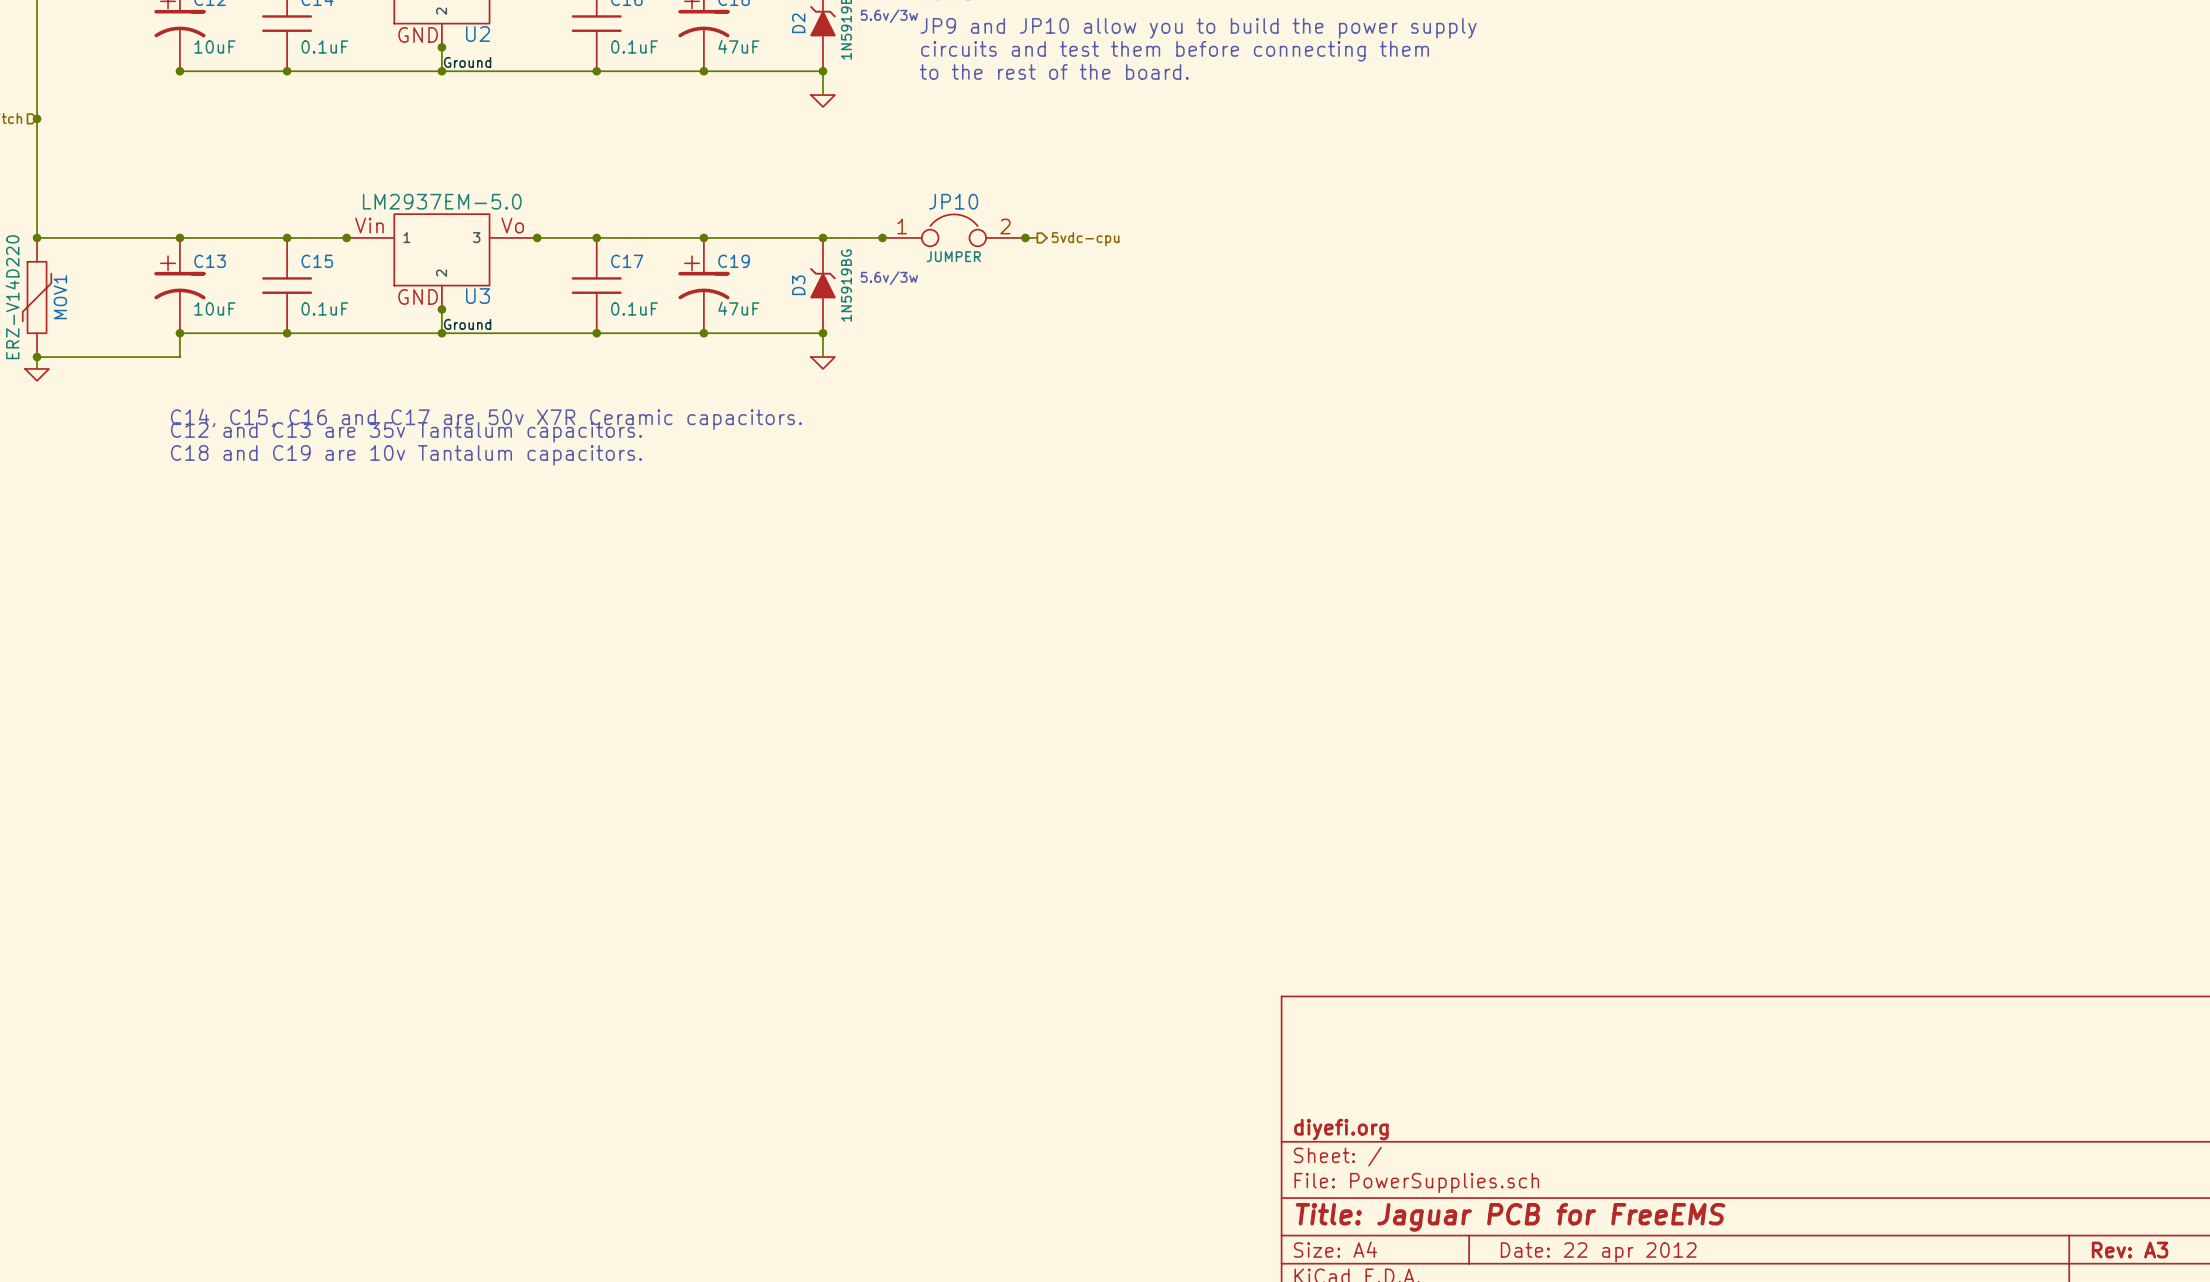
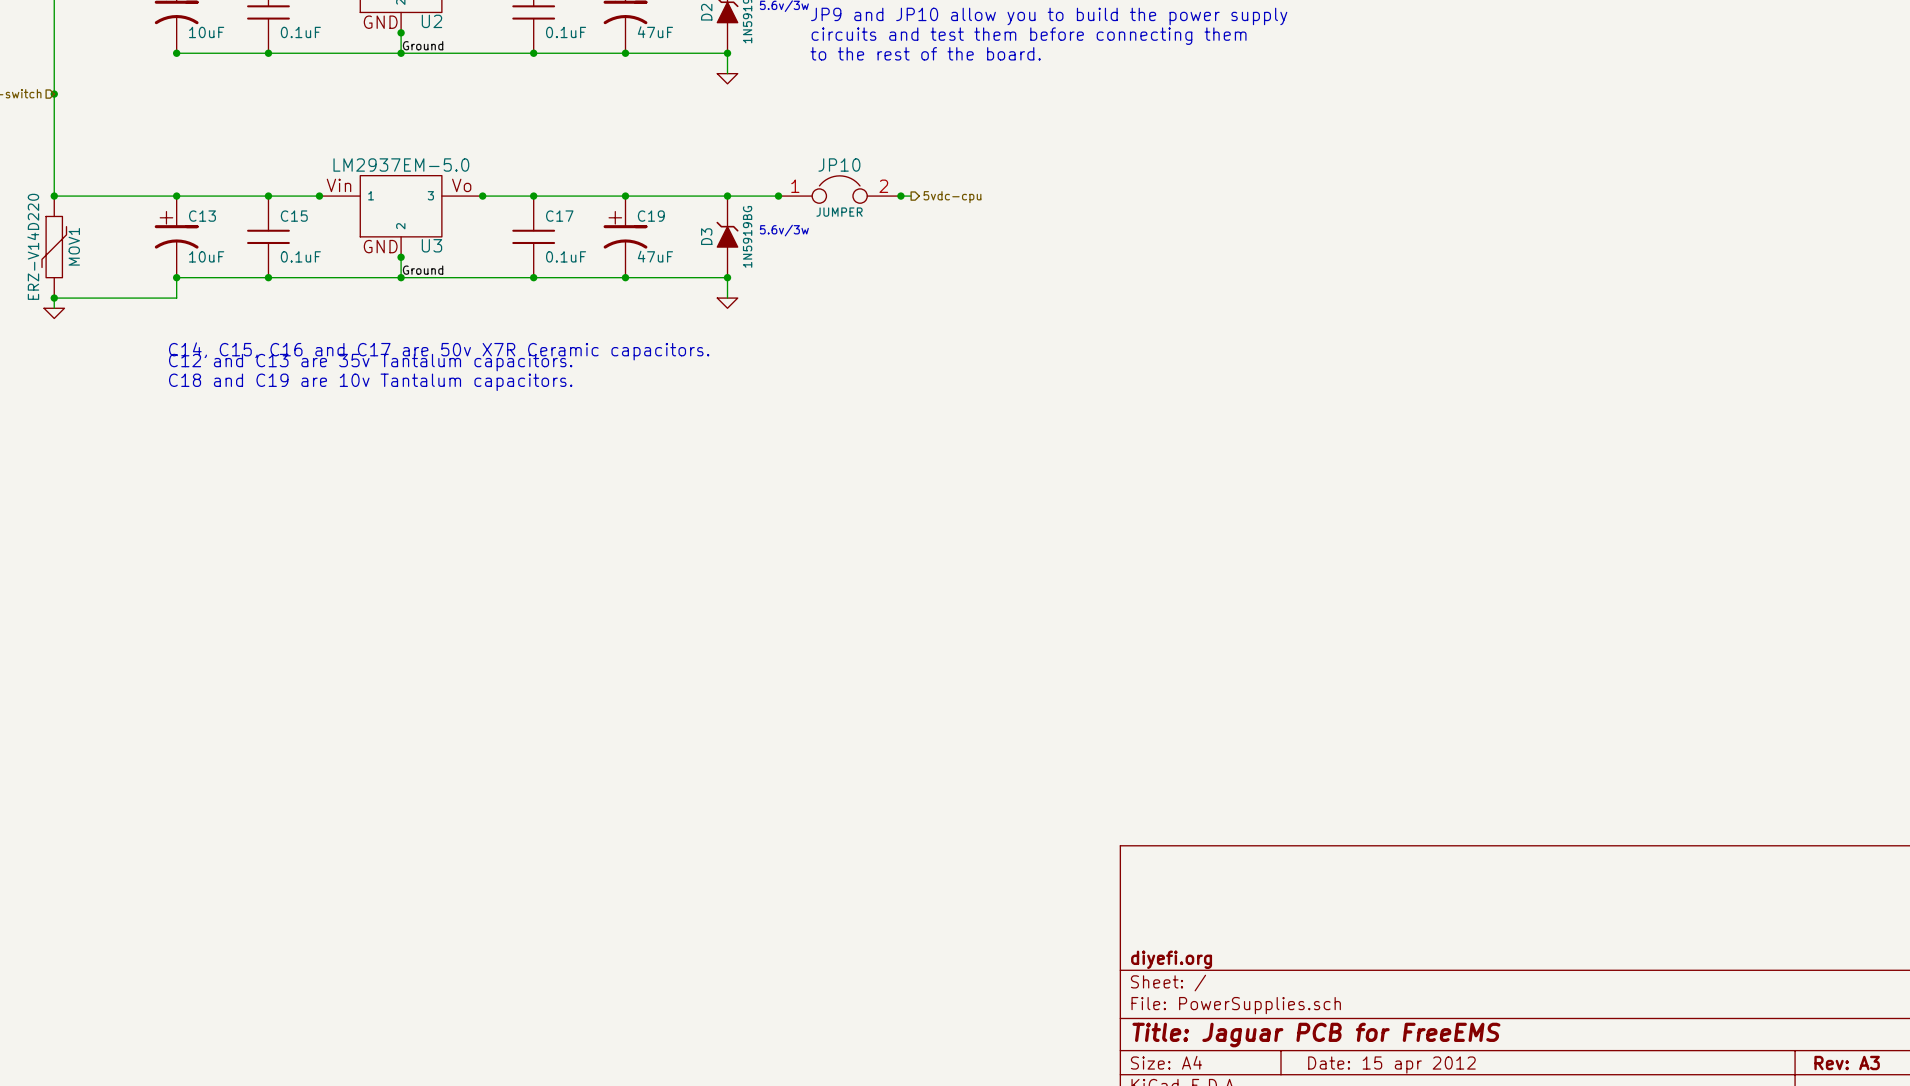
title block: Date: 22 apr 2012 (1598, 1252) -> Date: 15 apr 2012 (1391, 1065)

